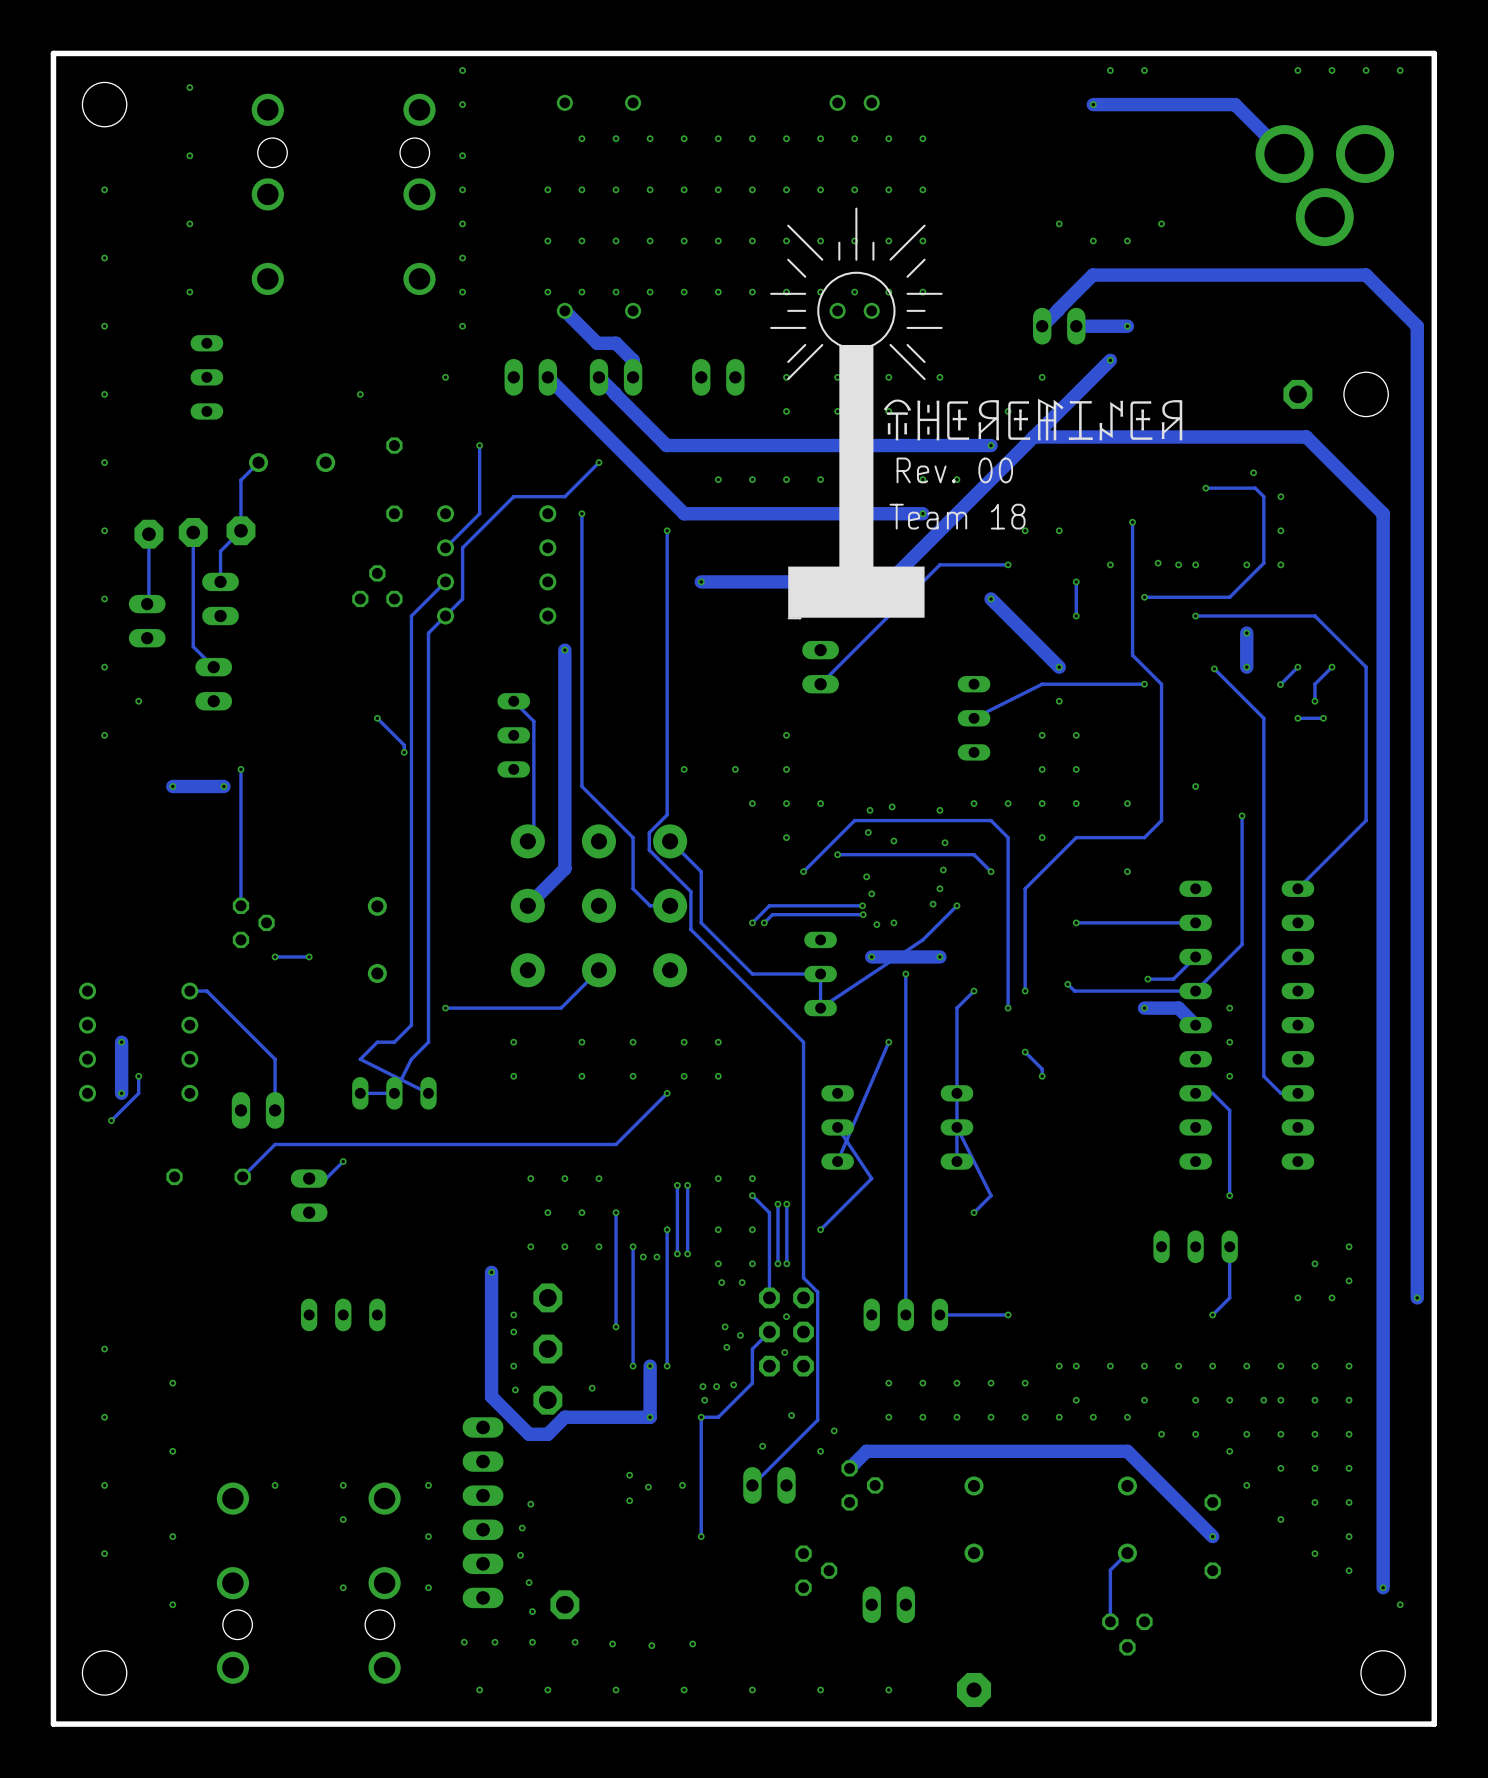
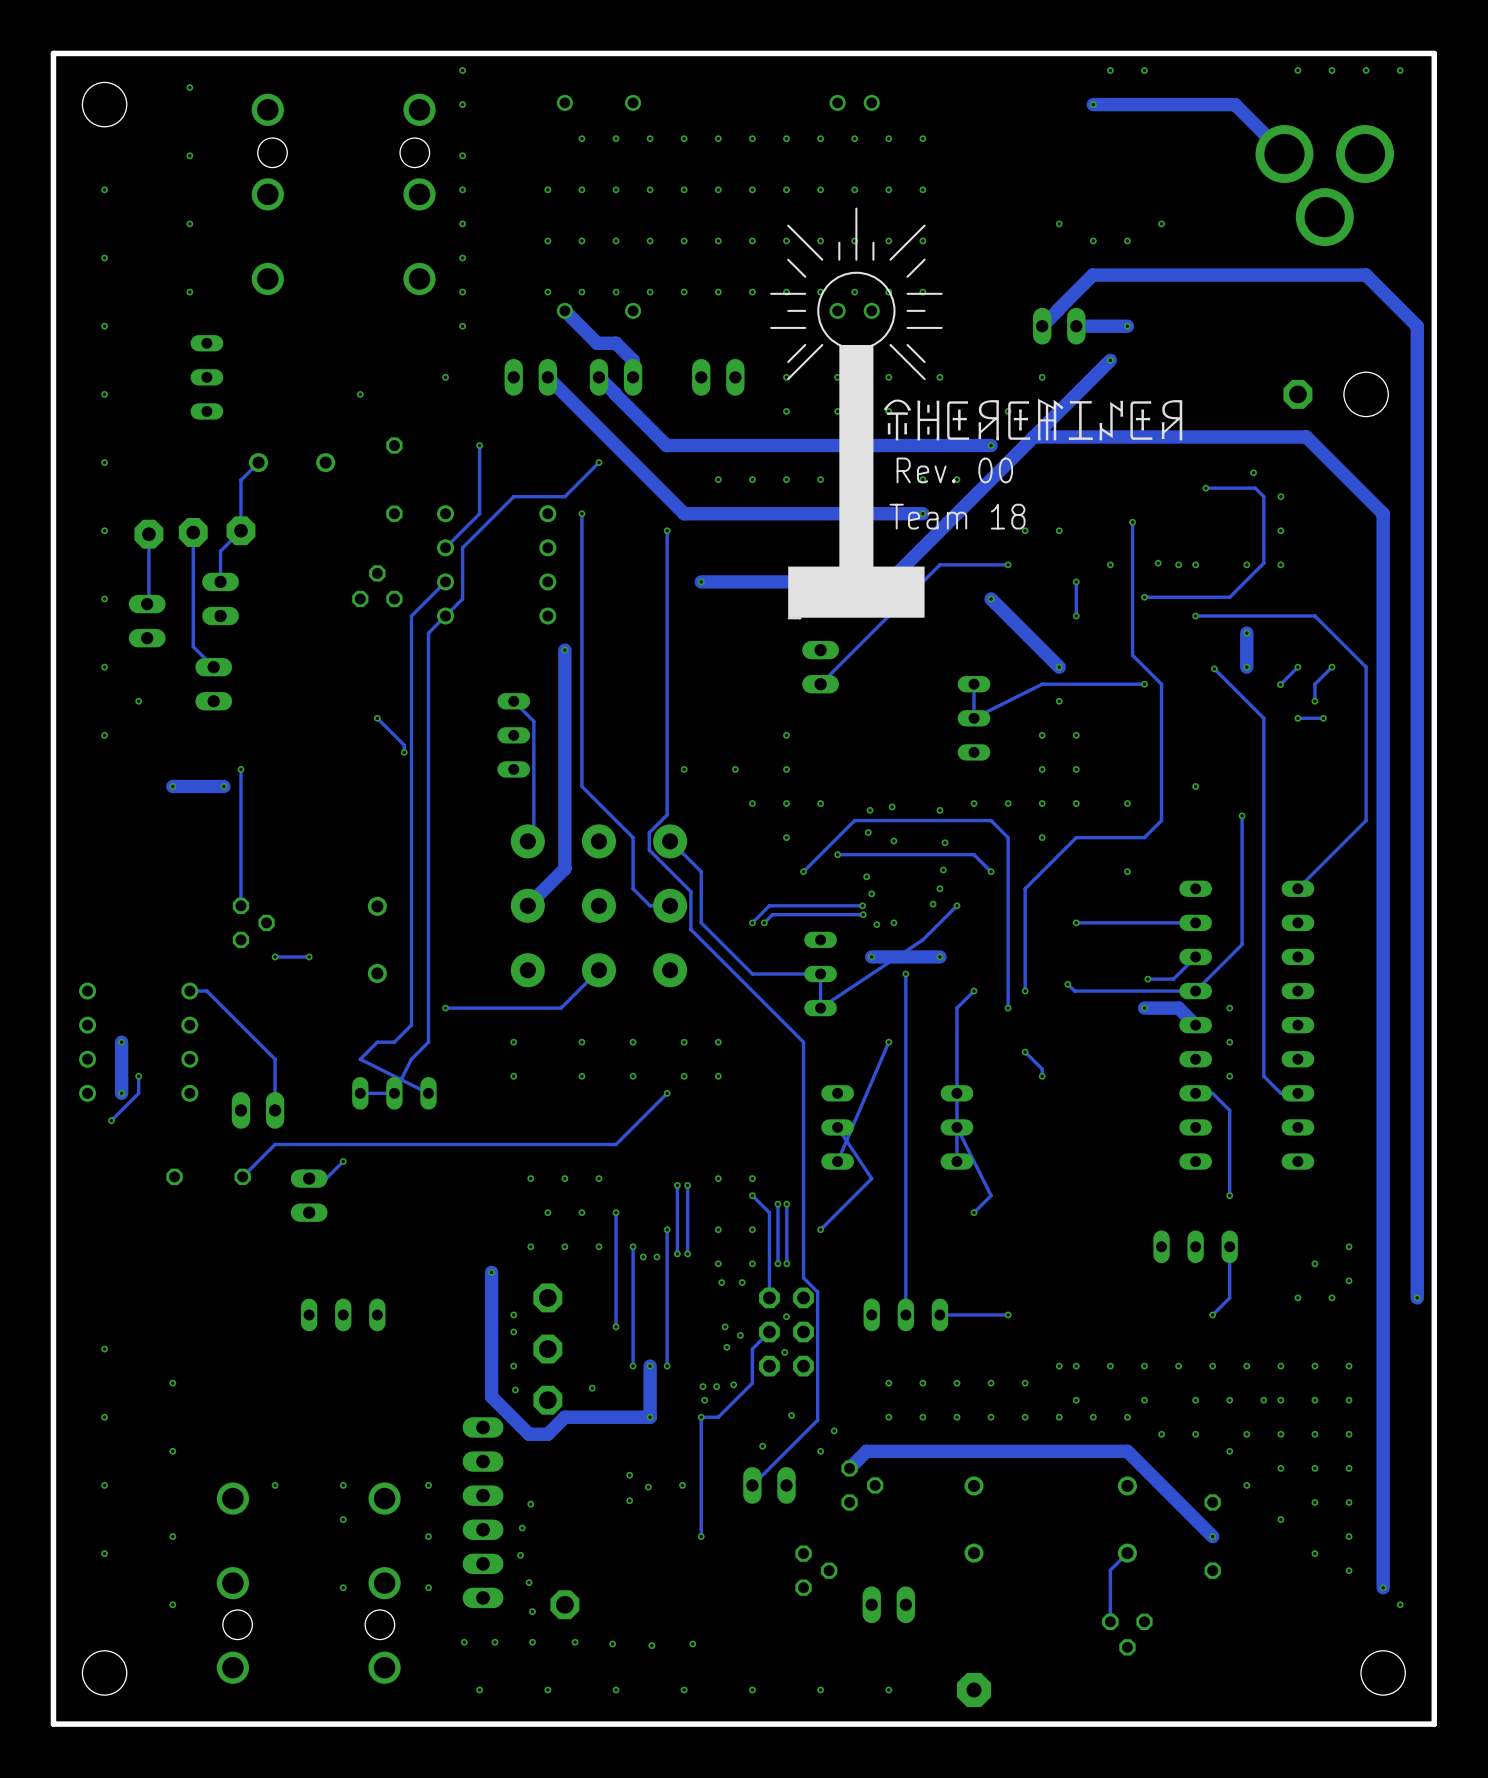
track: none -> (974, 684) (974, 718)

